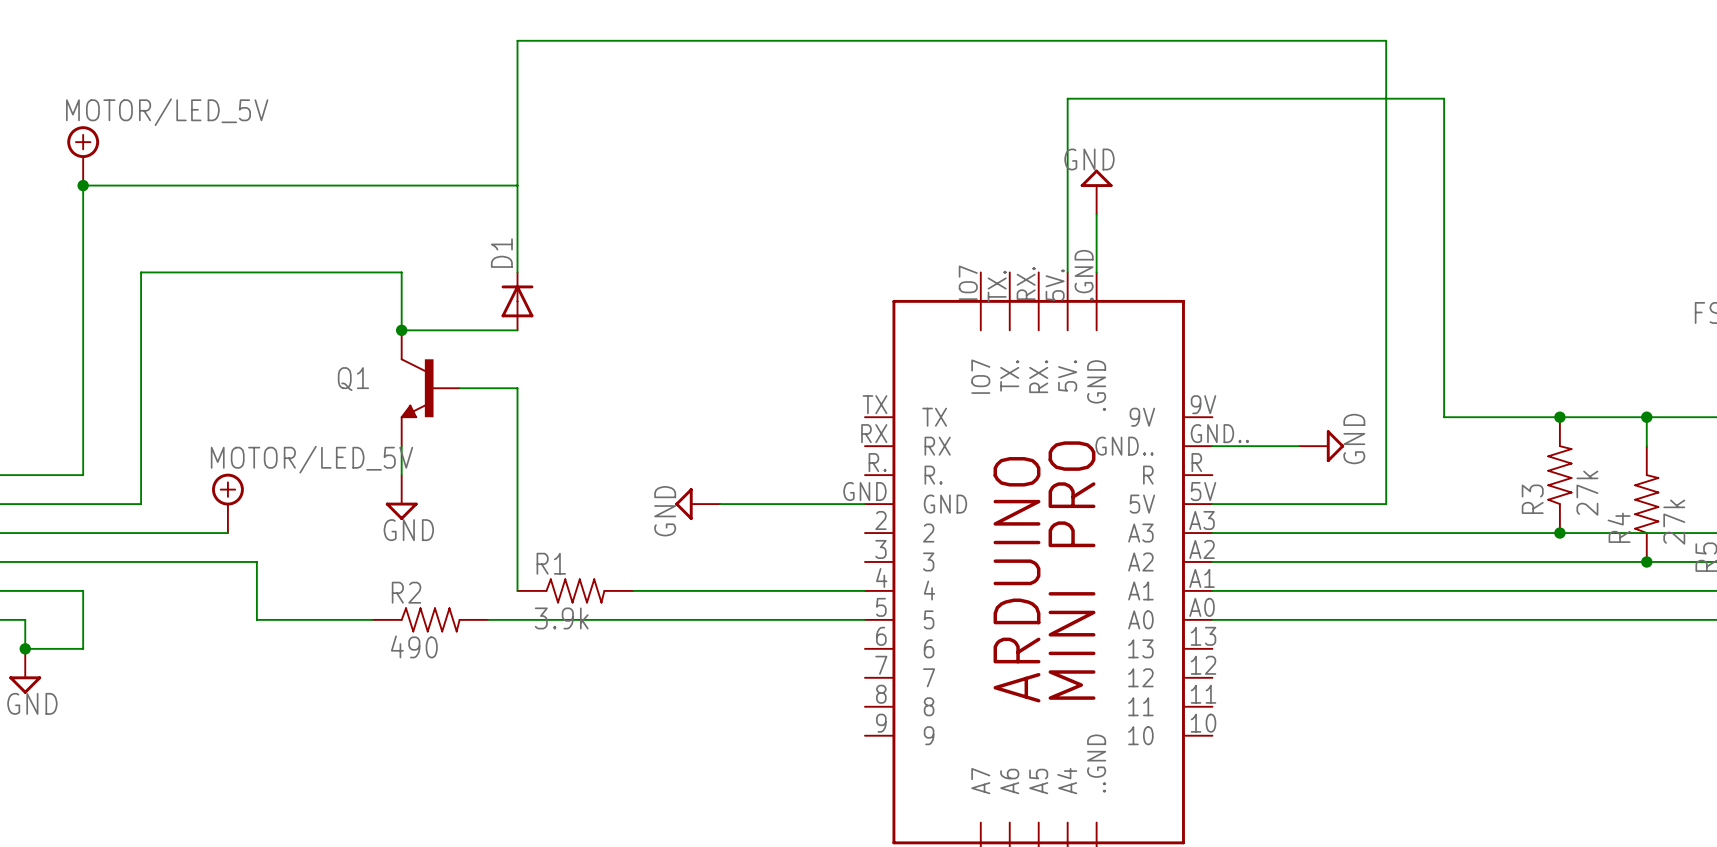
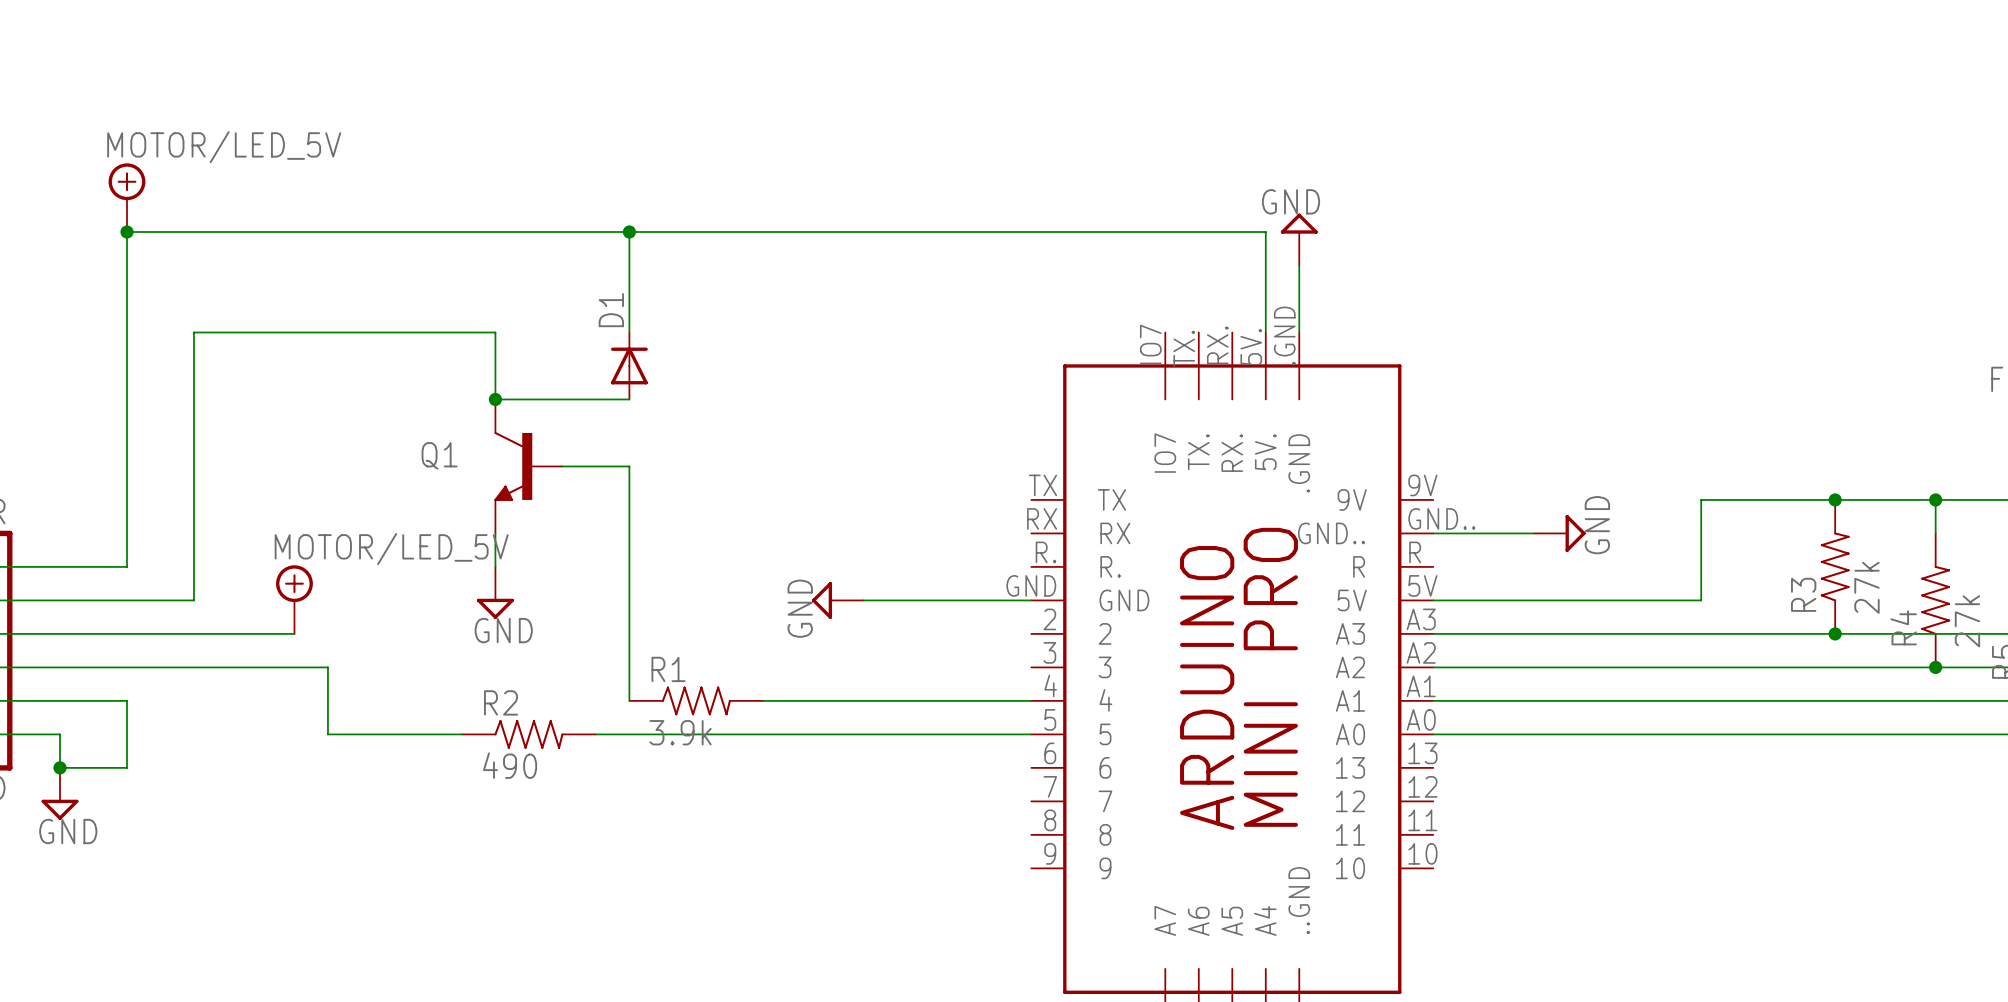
wire: (517, 185) (517, 40) (1386, 40) (1386, 504) -> (629, 232) (1265, 232)
junction: none -> (629, 232)
wire: (1067, 185) (1067, 98) (1444, 98) (1444, 417) -> (1634, 600) (1701, 600) (1701, 499)

